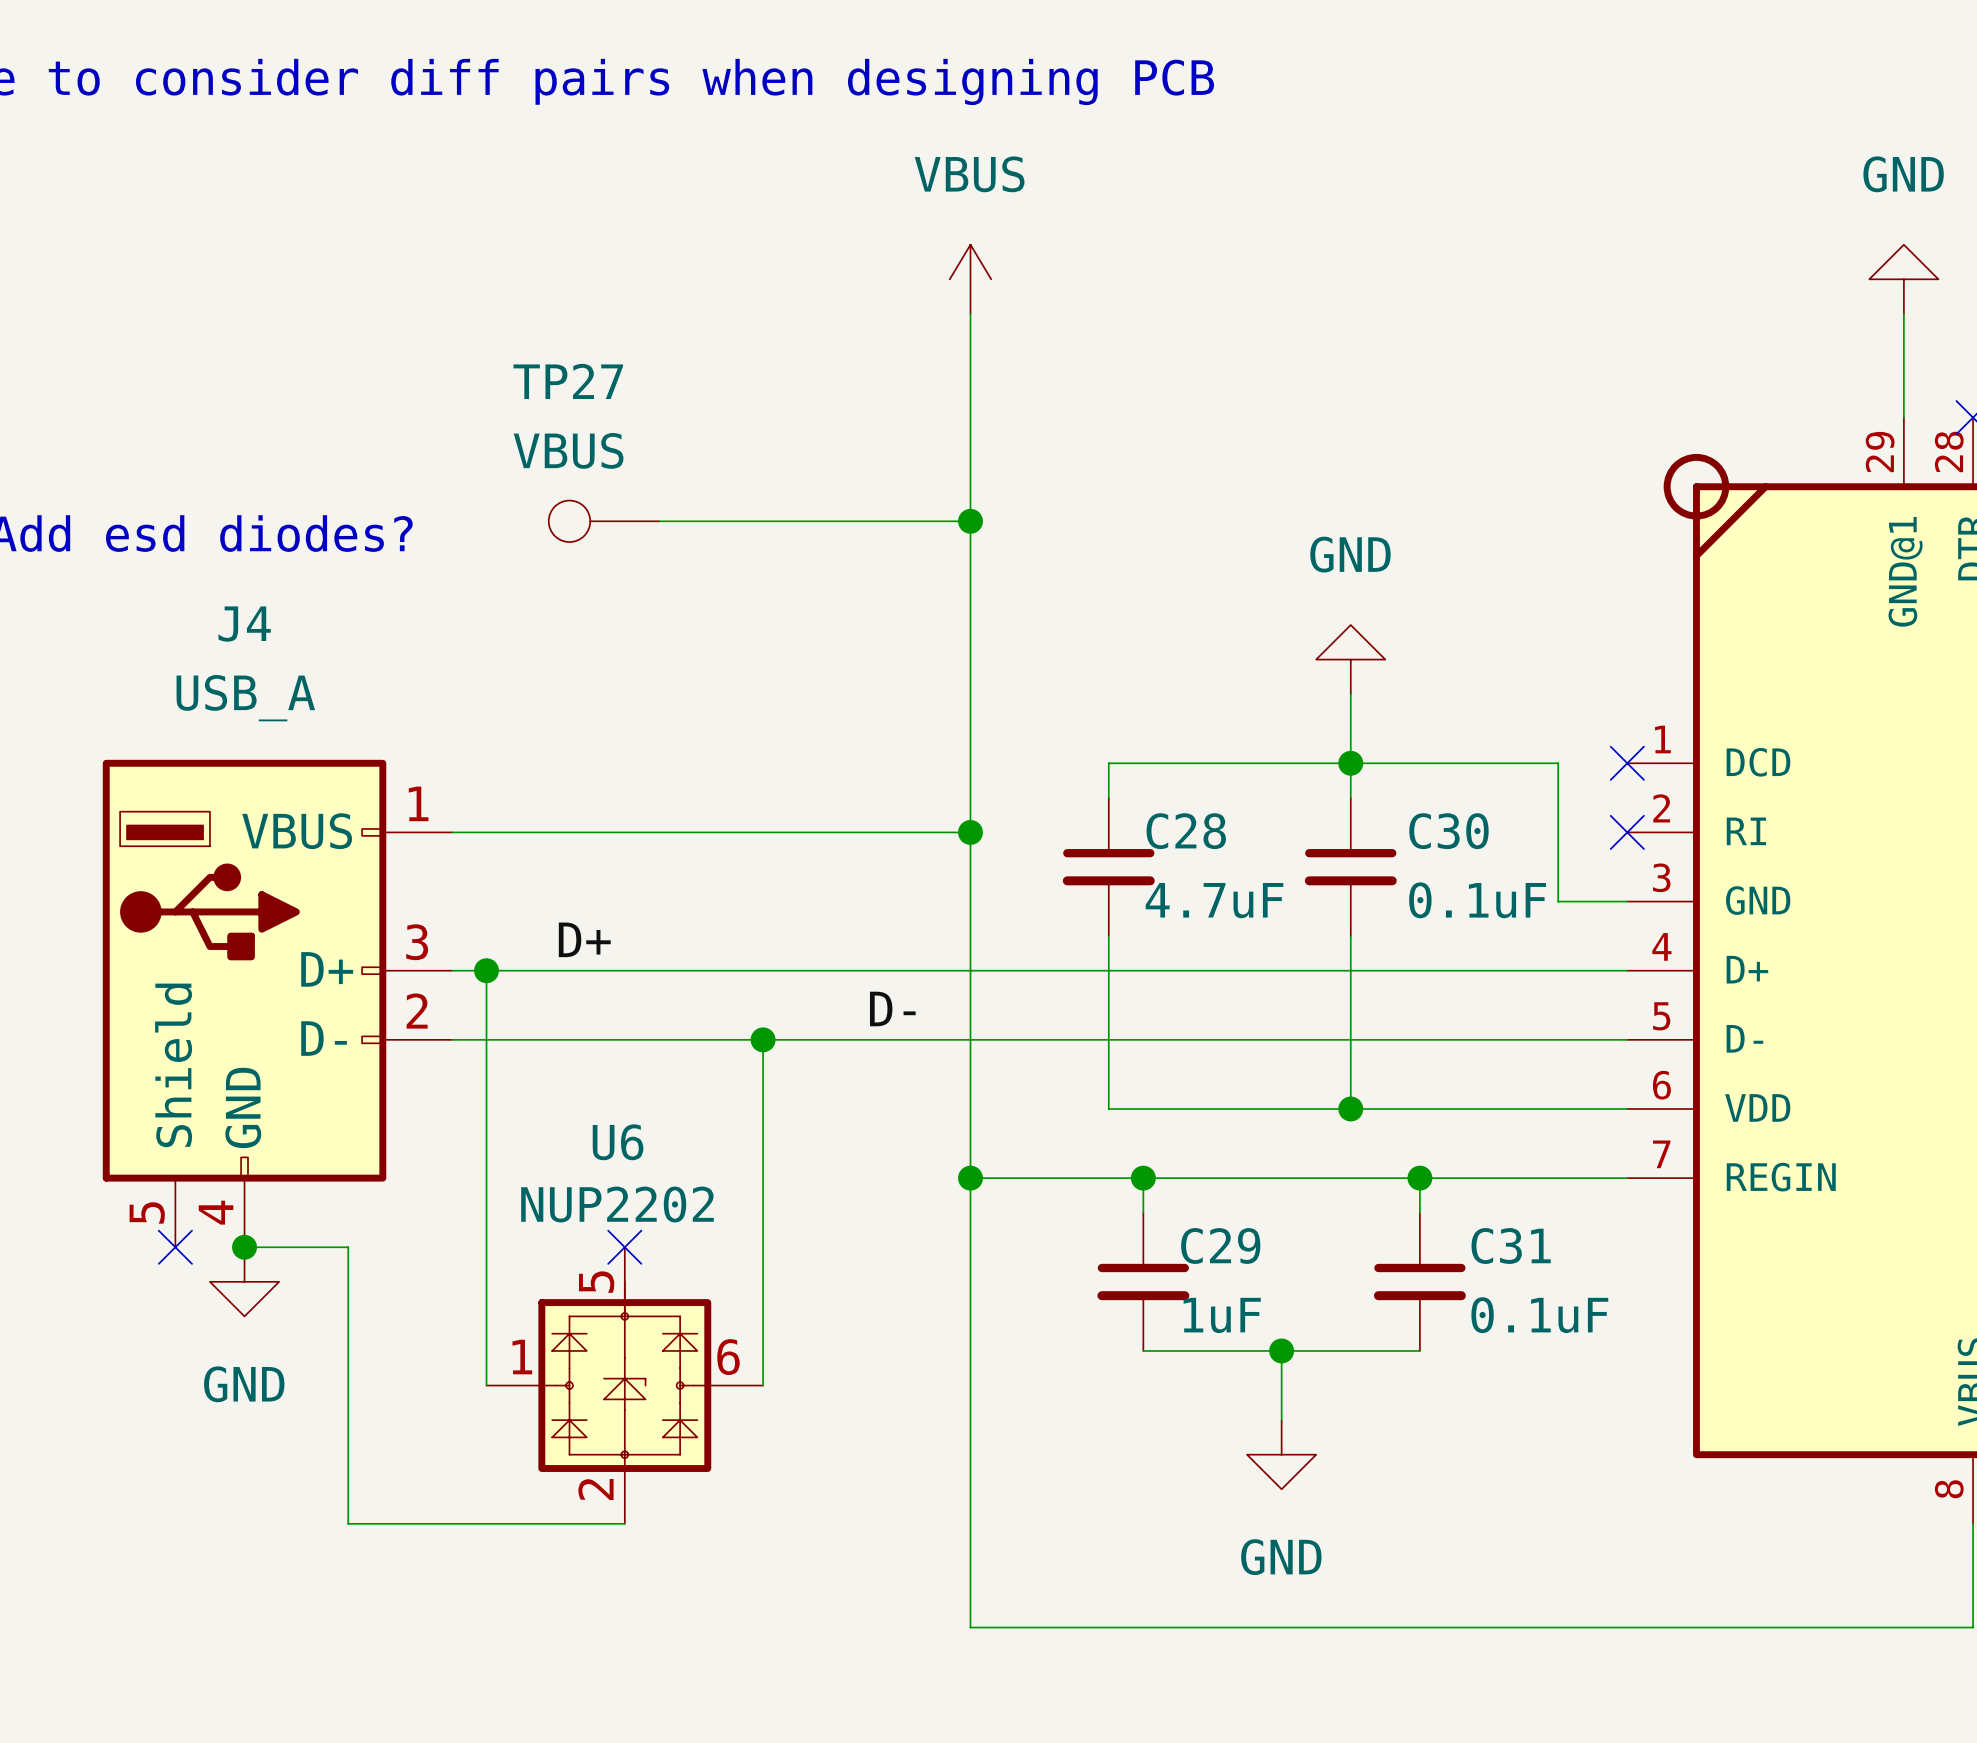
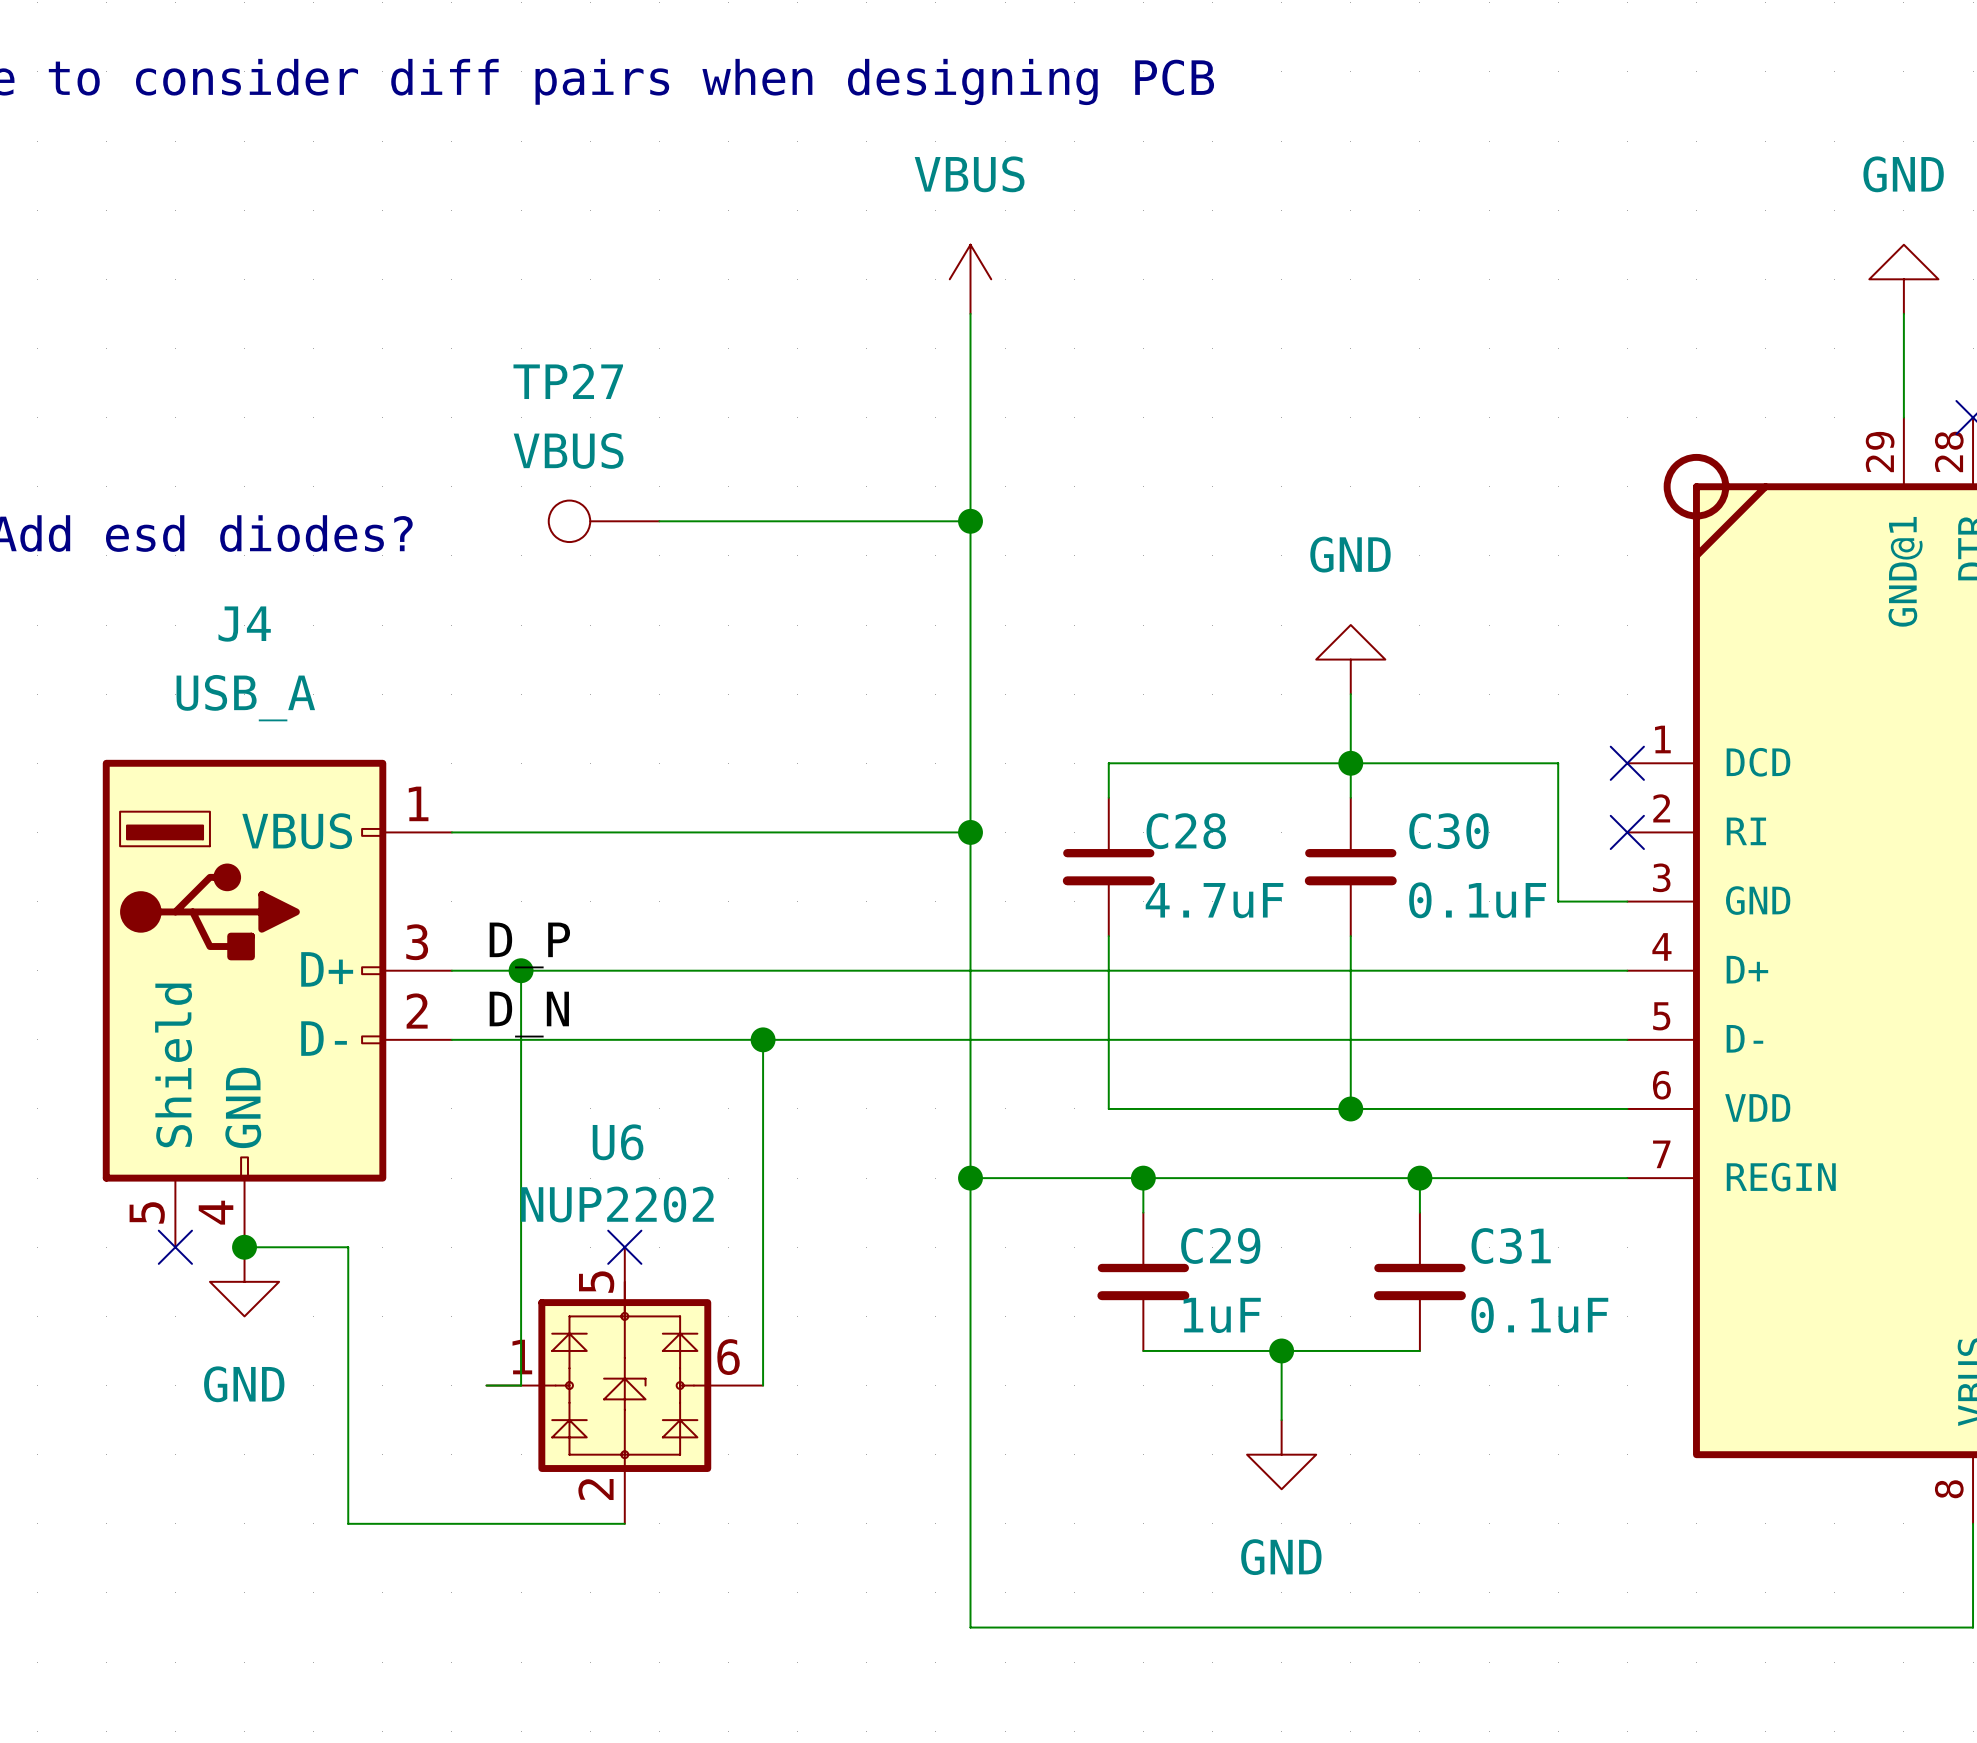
label: D+ (584, 939) -> none
label: none -> D_P (529, 945)
wire: (486, 970) (486, 1385) -> (521, 970) (521, 1385) (486, 1385)
junction position: (486, 970) -> (521, 970)
label: D- (892, 1008) -> none
label: none -> D_N (529, 1014)

